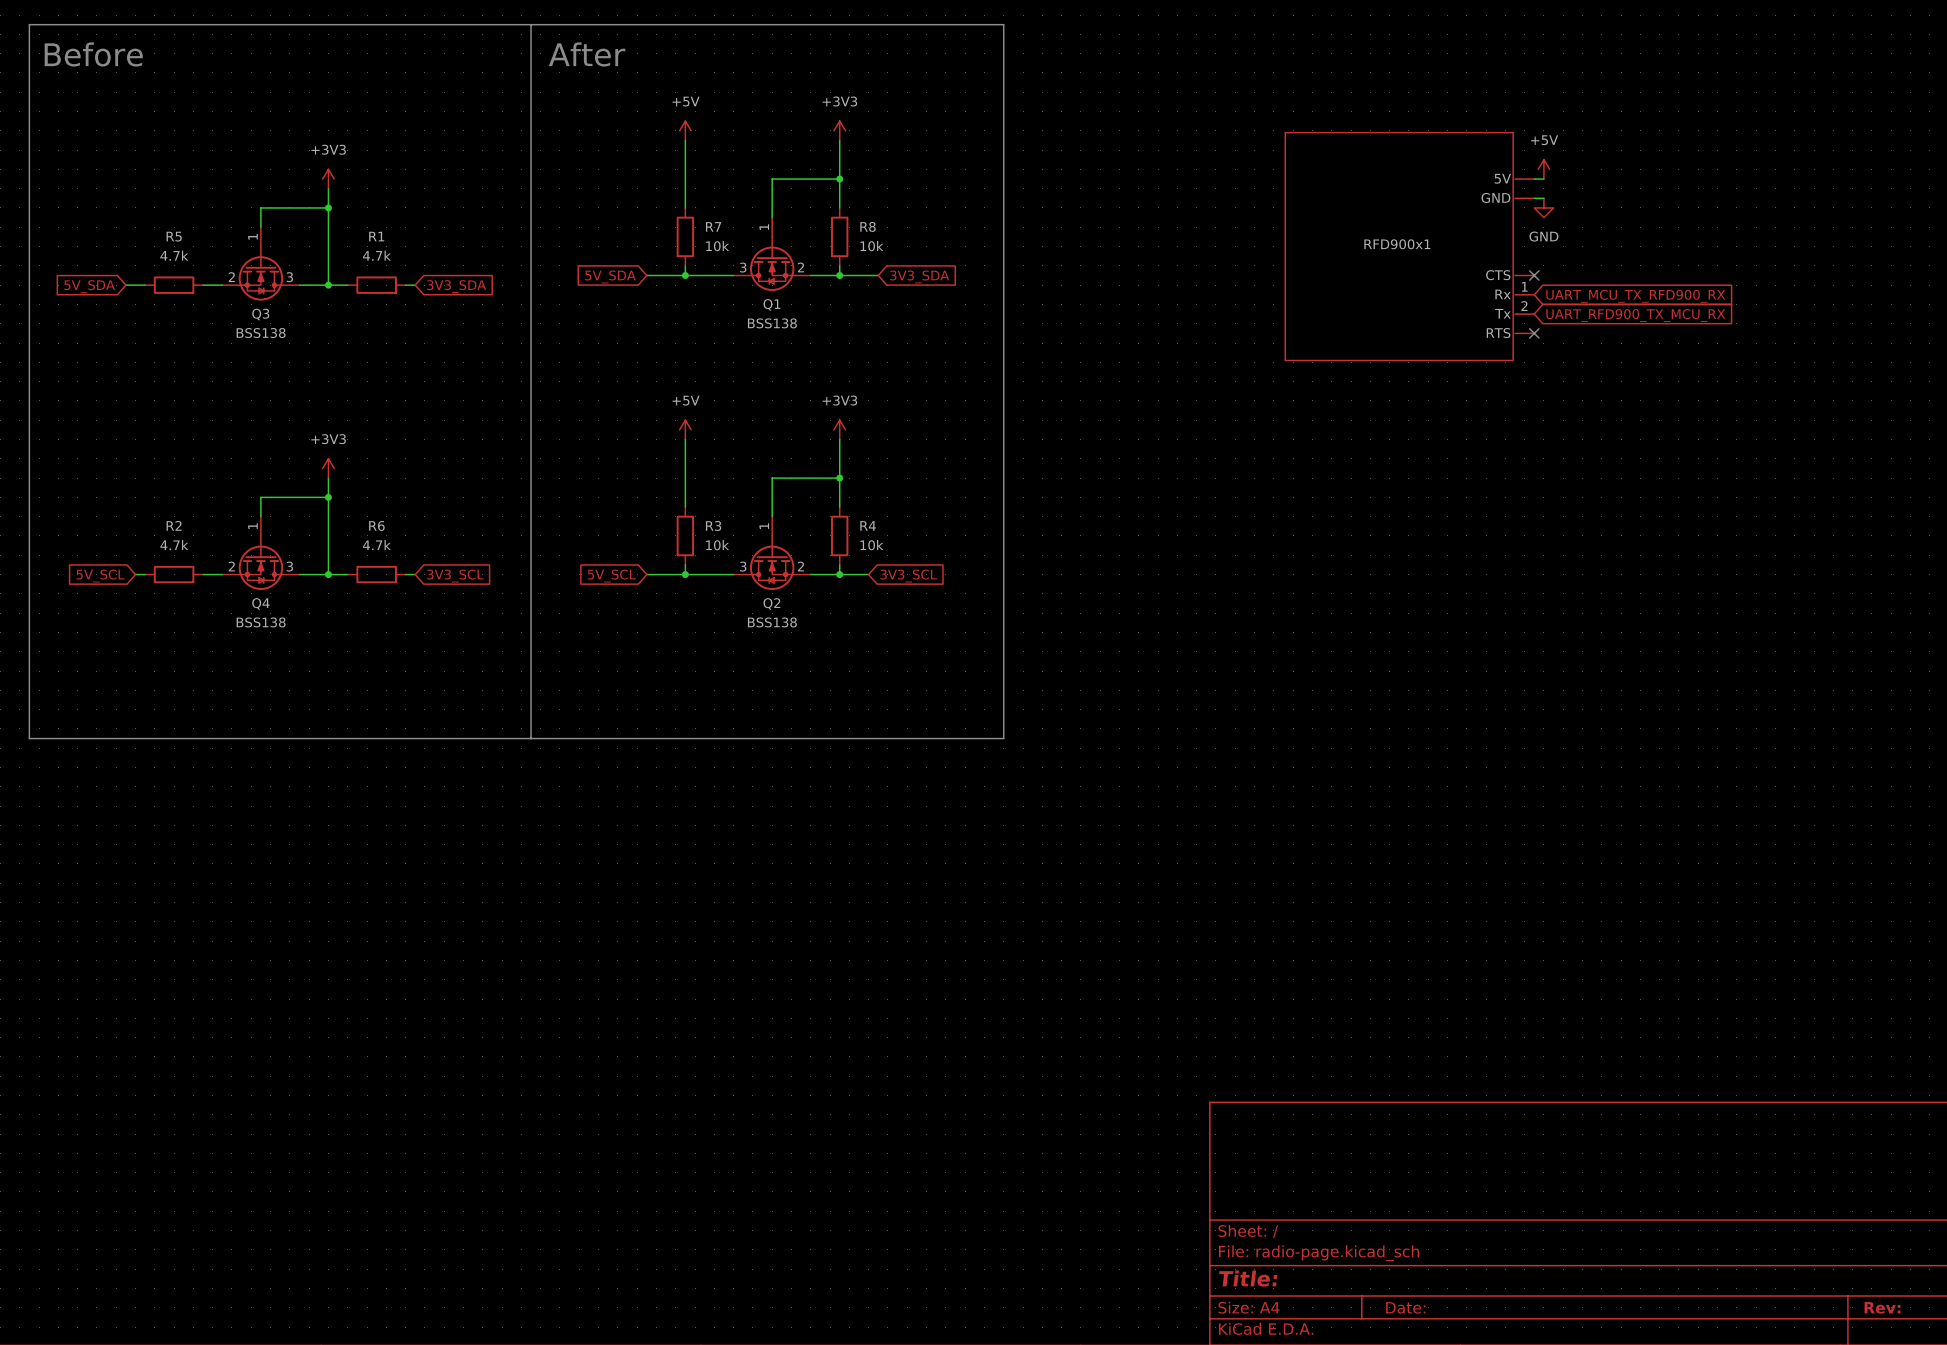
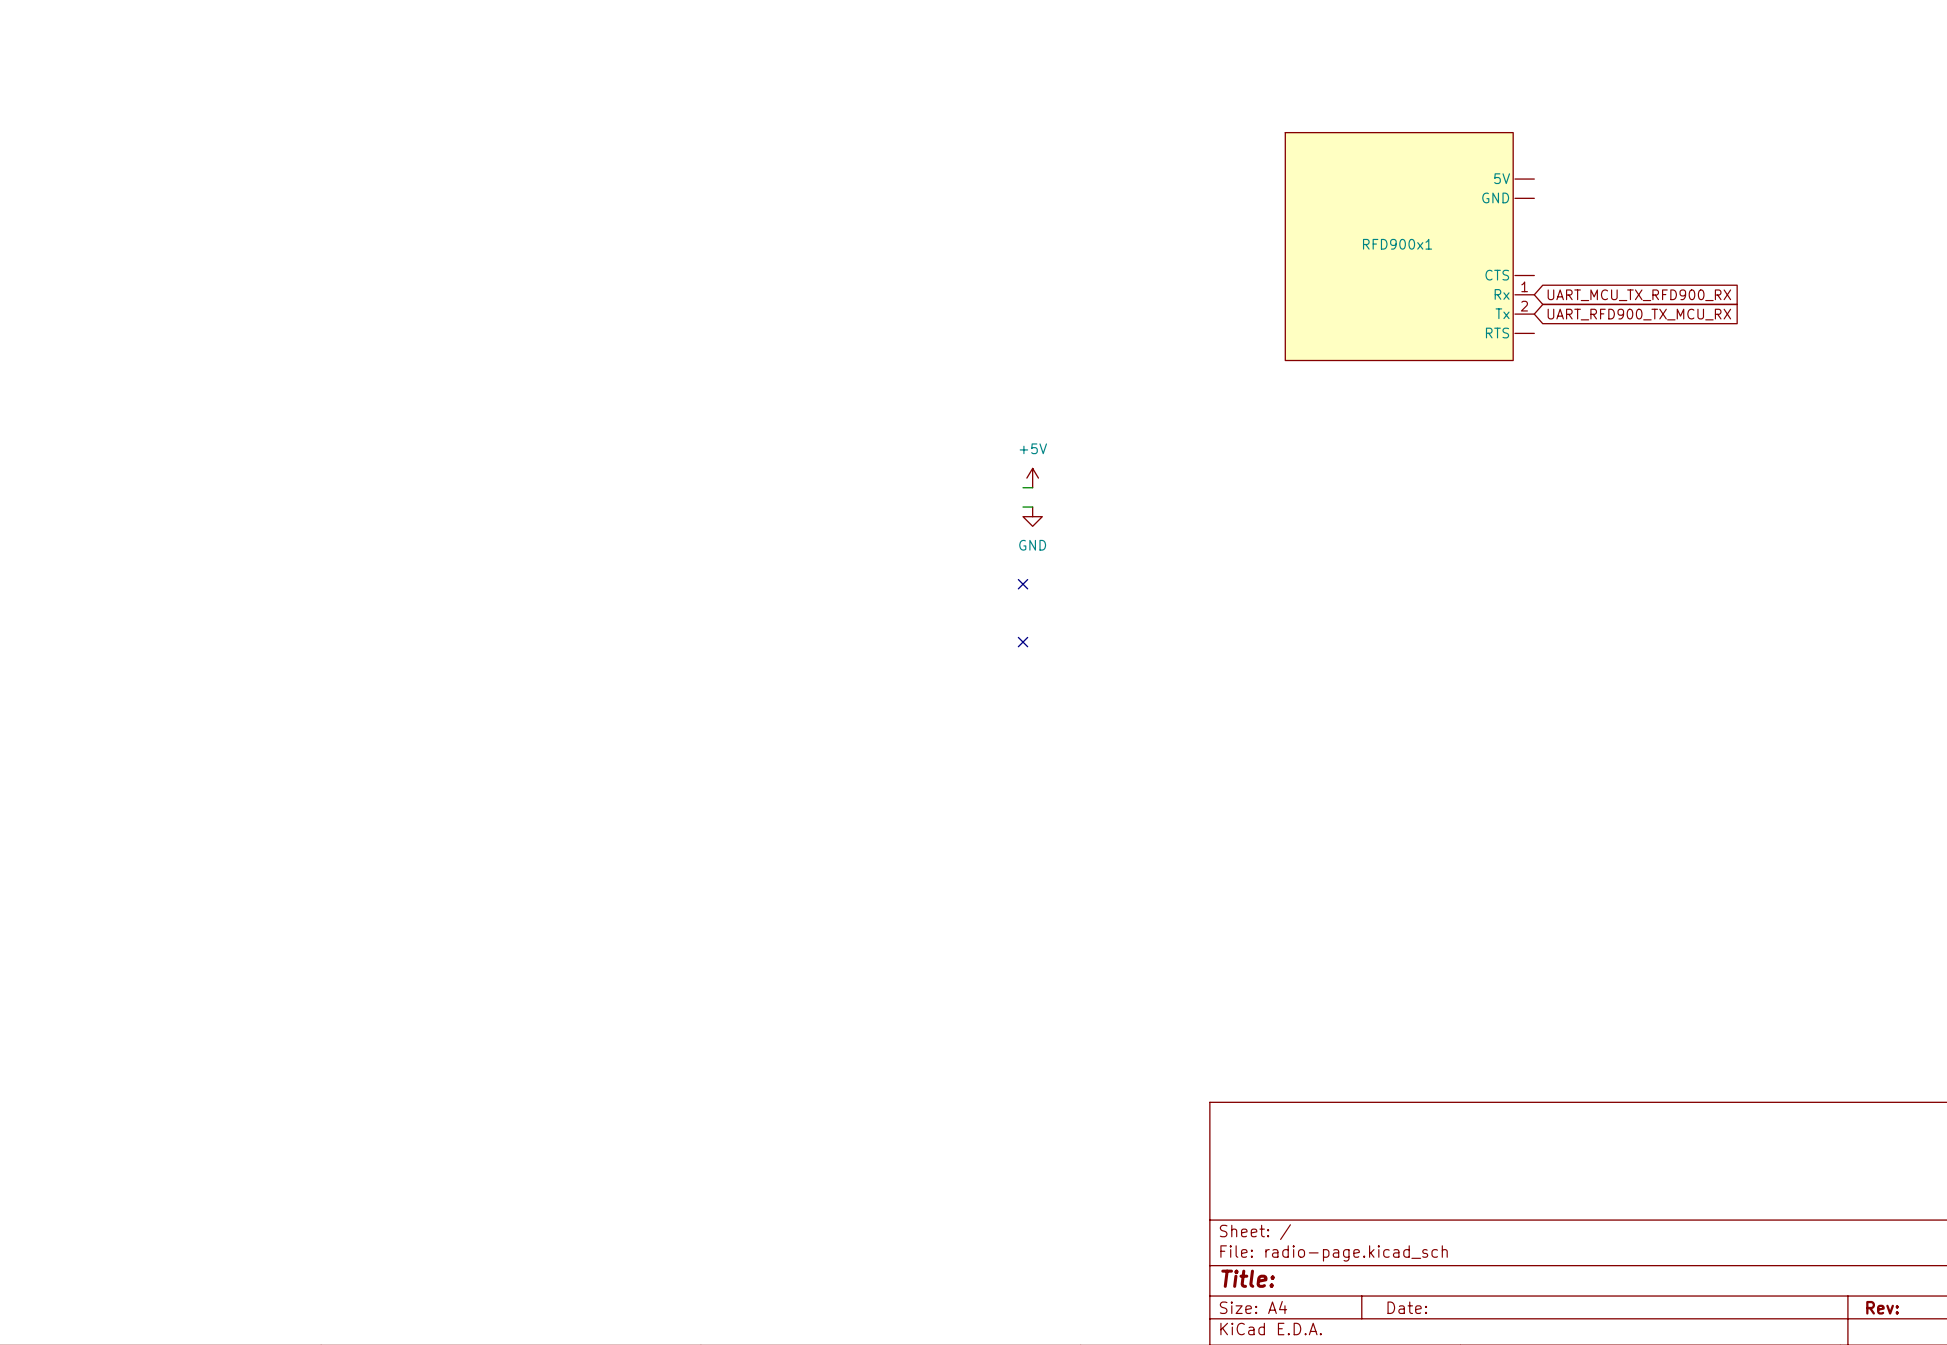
line: (29, 24) (1003, 24) (1003, 738) (29, 738) (29, 24) -> none
line: (531, 24) (531, 738) -> none
text: Before (93, 54) -> none
text: After (587, 54) -> none
power symbol: +5V (685, 130) -> none
power symbol: +3V3 (839, 130) -> none
wire: (685, 140) (685, 207) -> none
wire: (839, 140) (839, 207) -> none
power symbol: +5V (1543, 169) -> none
power symbol: +3V3 (328, 179) -> none
wire: (839, 179) (772, 179) (772, 217) -> none
junction: (839, 179) -> none
wire: (1534, 179) (1543, 179) -> none
wire: (328, 188) (328, 285) -> none
wire: (1534, 198) (1543, 198) -> none
wire: (328, 207) (260, 207) (260, 227) -> none
junction: (328, 207) -> none
power symbol: GND (1543, 207) -> none
R7: 10k (685, 236) -> none
R8: 10k (839, 236) -> none
Q1: BSS138 (772, 254) -> none
Q3: BSS138 (260, 263) -> none
wire: (685, 265) (685, 275) -> none
wire: (839, 265) (839, 275) -> none
wire: (646, 275) (733, 275) -> none
junction: (685, 275) -> none
wire: (810, 275) (878, 275) -> none
junction: (839, 275) -> none
no-connect mark: (1534, 275) -> none
global label: 5V_SDA (610, 276) -> none
global label: 3V3_SDA (919, 276) -> none
wire: (125, 285) (145, 285) -> none
R5: 4.7k (174, 285) -> none
wire: (203, 285) (222, 285) -> none
wire: (299, 285) (347, 285) -> none
junction: (328, 285) -> none
R1: 4.7k (376, 285) -> none
wire: (405, 285) (415, 285) -> none
global label: 5V_SDA (89, 286) -> none
global label: 3V3_SDA (456, 286) -> none
no-connect mark: (1534, 333) -> none
power symbol: +5V (685, 429) -> none
power symbol: +3V3 (839, 429) -> none
wire: (685, 439) (685, 507) -> none
wire: (839, 439) (839, 507) -> none
power symbol: +3V3 (328, 468) -> none
wire: (328, 478) (328, 574) -> none
wire: (839, 478) (772, 478) (772, 516) -> none
junction: (839, 478) -> none
power symbol: none -> +5V (1032, 478)
wire: none -> (1023, 487) (1032, 487)
wire: (328, 497) (260, 497) (260, 516) -> none
junction: (328, 497) -> none
wire: none -> (1023, 507) (1032, 507)
power symbol: none -> GND (1032, 516)
R3: 10k (685, 535) -> none
R4: 10k (839, 535) -> none
Q4: BSS138 (260, 553) -> none
Q2: BSS138 (772, 553) -> none
wire: (685, 564) (685, 574) -> none
wire: (839, 564) (839, 574) -> none
wire: (135, 574) (145, 574) -> none
R2: 4.7k (174, 574) -> none
wire: (203, 574) (222, 574) -> none
wire: (299, 574) (347, 574) -> none
junction: (328, 574) -> none
R6: 4.7k (376, 574) -> none
wire: (405, 574) (415, 574) -> none
wire: (646, 574) (733, 574) -> none
junction: (685, 574) -> none
wire: (810, 574) (868, 574) -> none
junction: (839, 574) -> none
global label: 5V_SCL (100, 576) -> none
global label: 3V3_SCL (455, 576) -> none
global label: 5V_SCL (611, 576) -> none
global label: 3V3_SCL (908, 576) -> none
no-connect mark: none -> (1023, 584)
no-connect mark: none -> (1023, 642)

